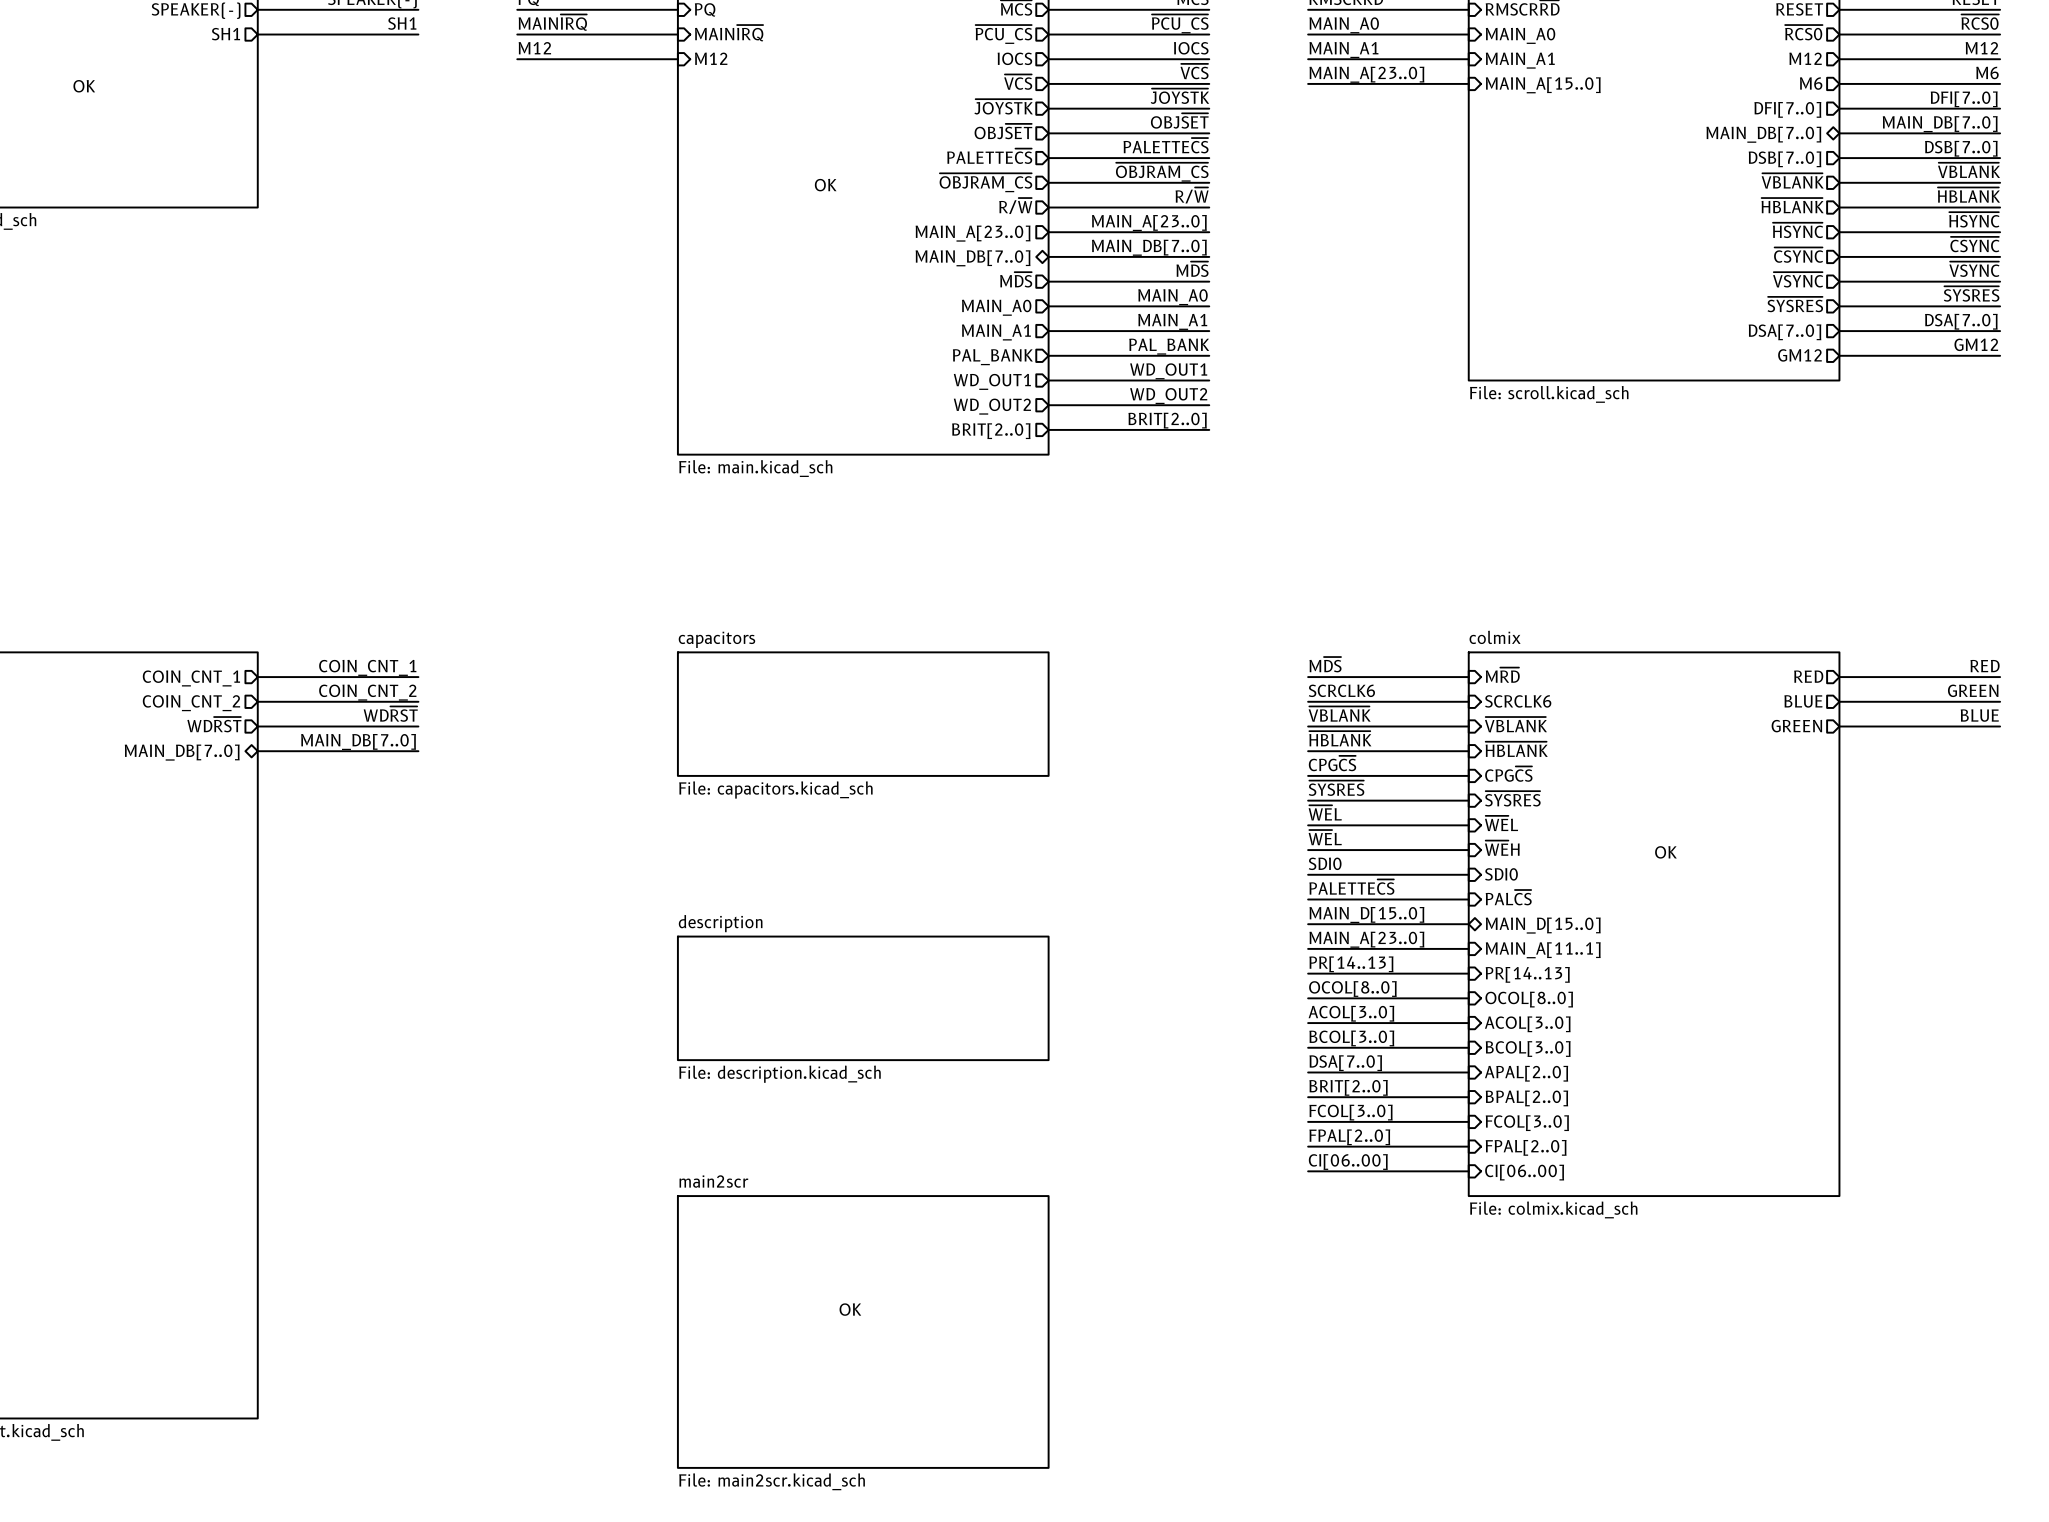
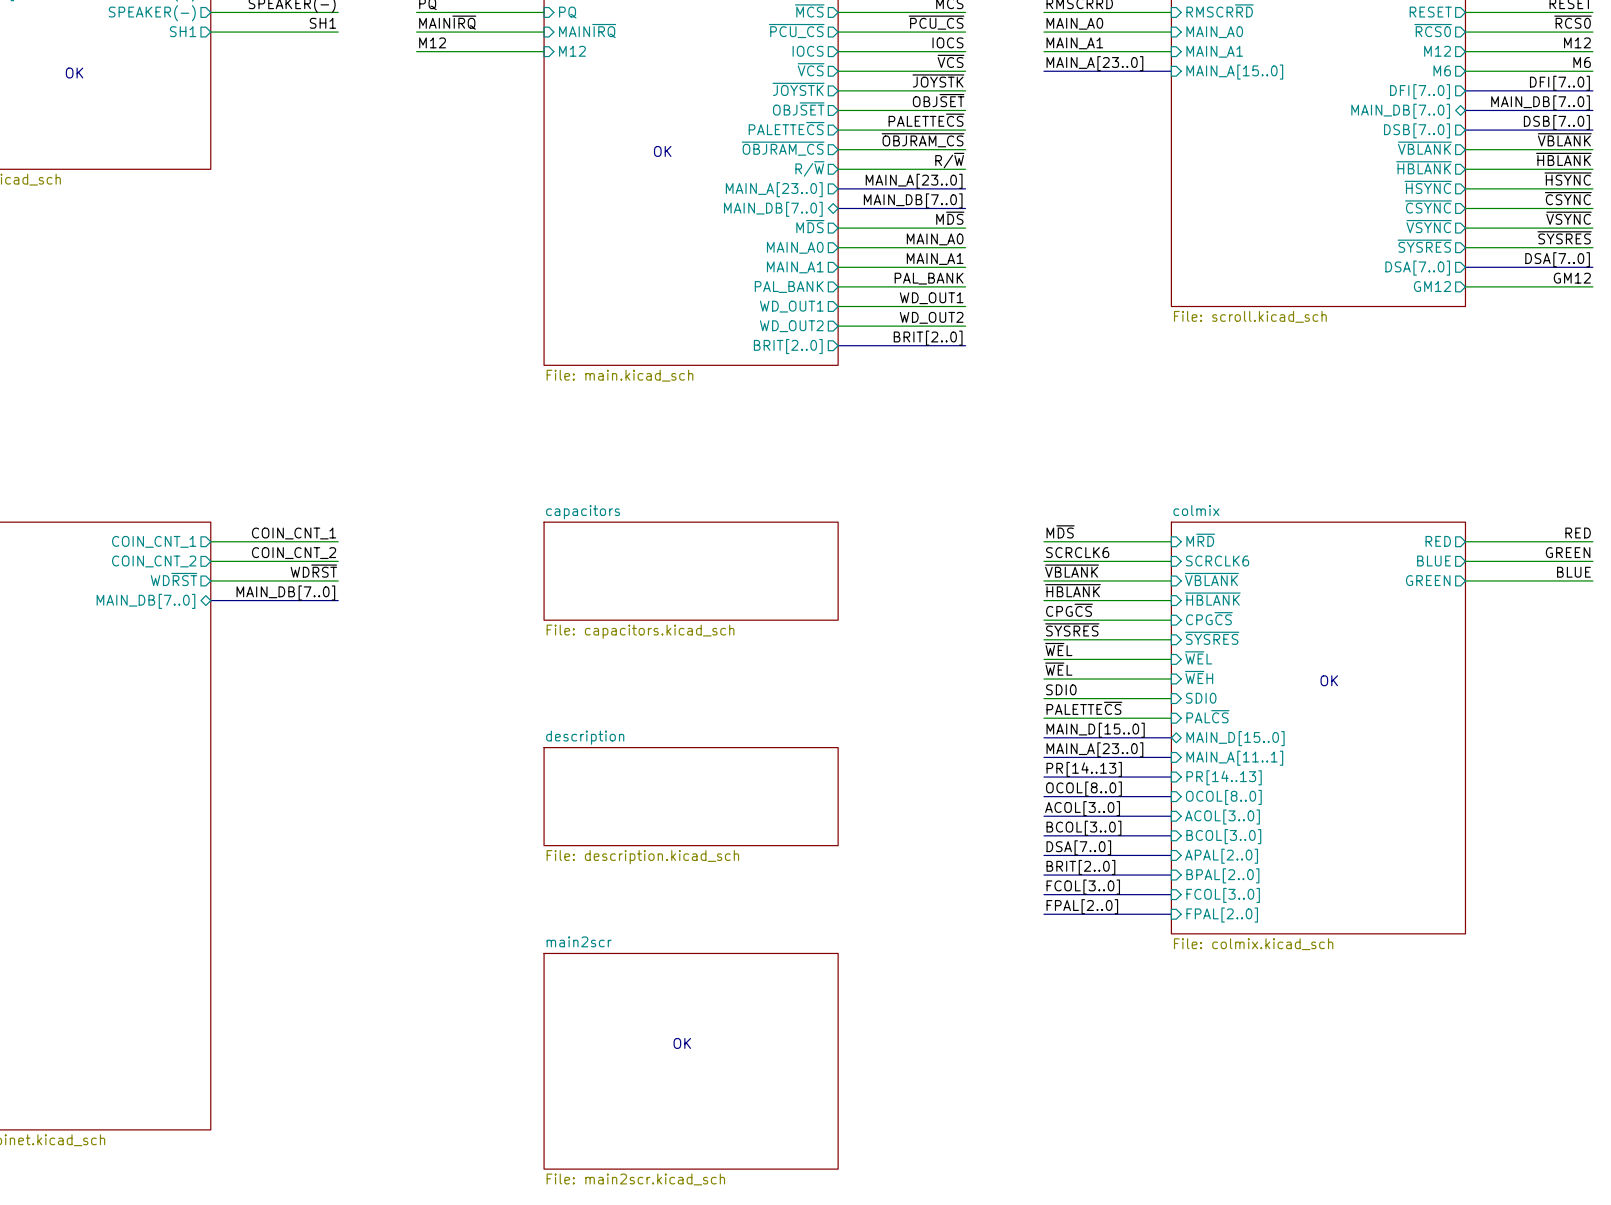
sheet colmix: none -> File: colmix.kicad_sch (1318, 728)
sheet colmix: File: colmix.kicad_sch (1654, 924) -> none
label: CI[06..00] (1348, 1162) -> none
bus: (1308, 1171) (1468, 1171) -> none
sheet pin: CI[06..00] (1524, 1172) -> none

